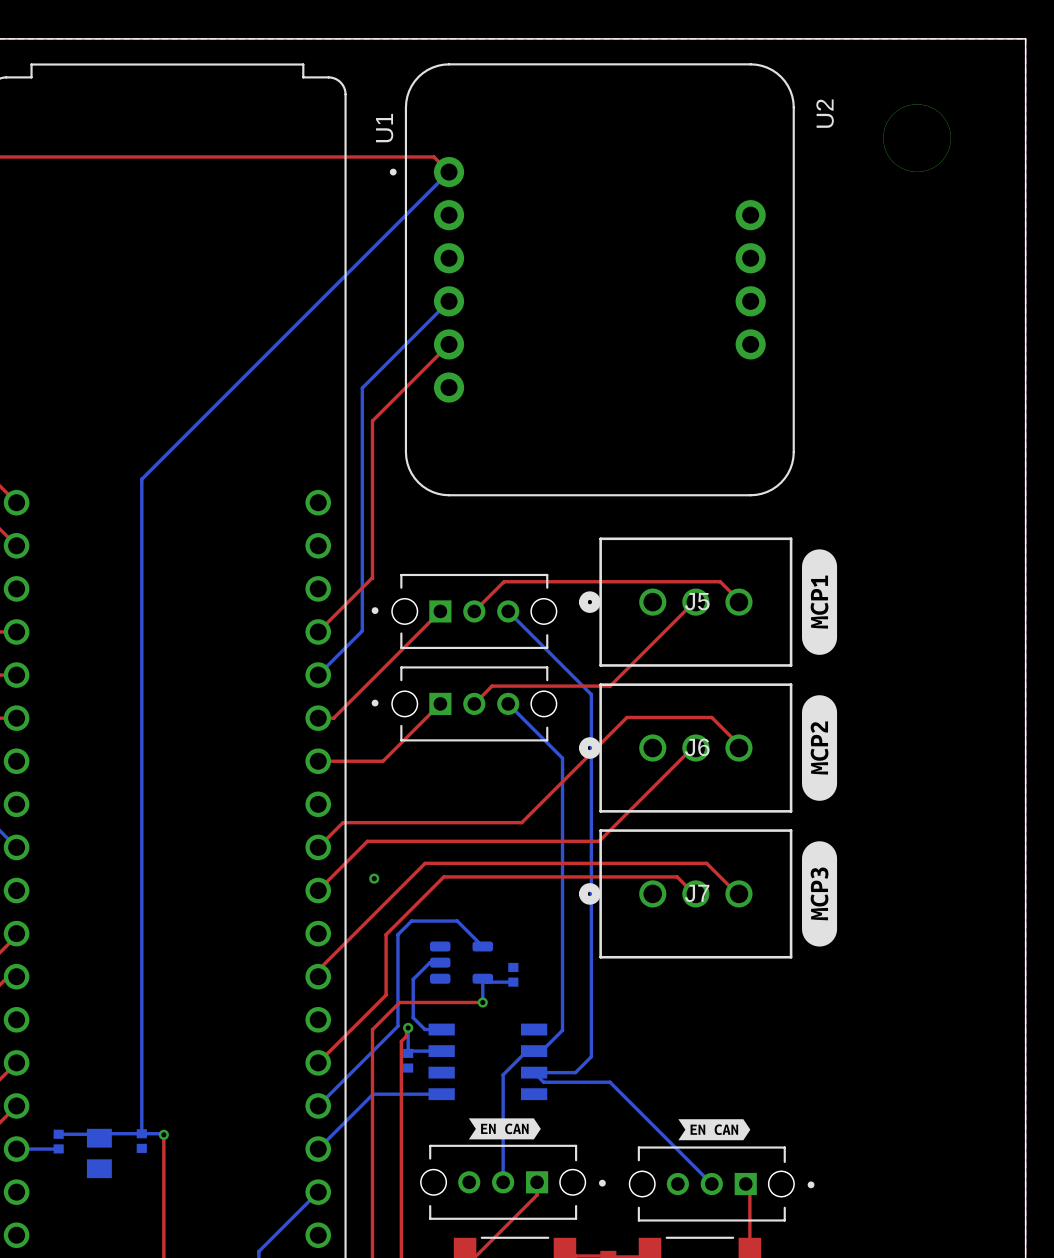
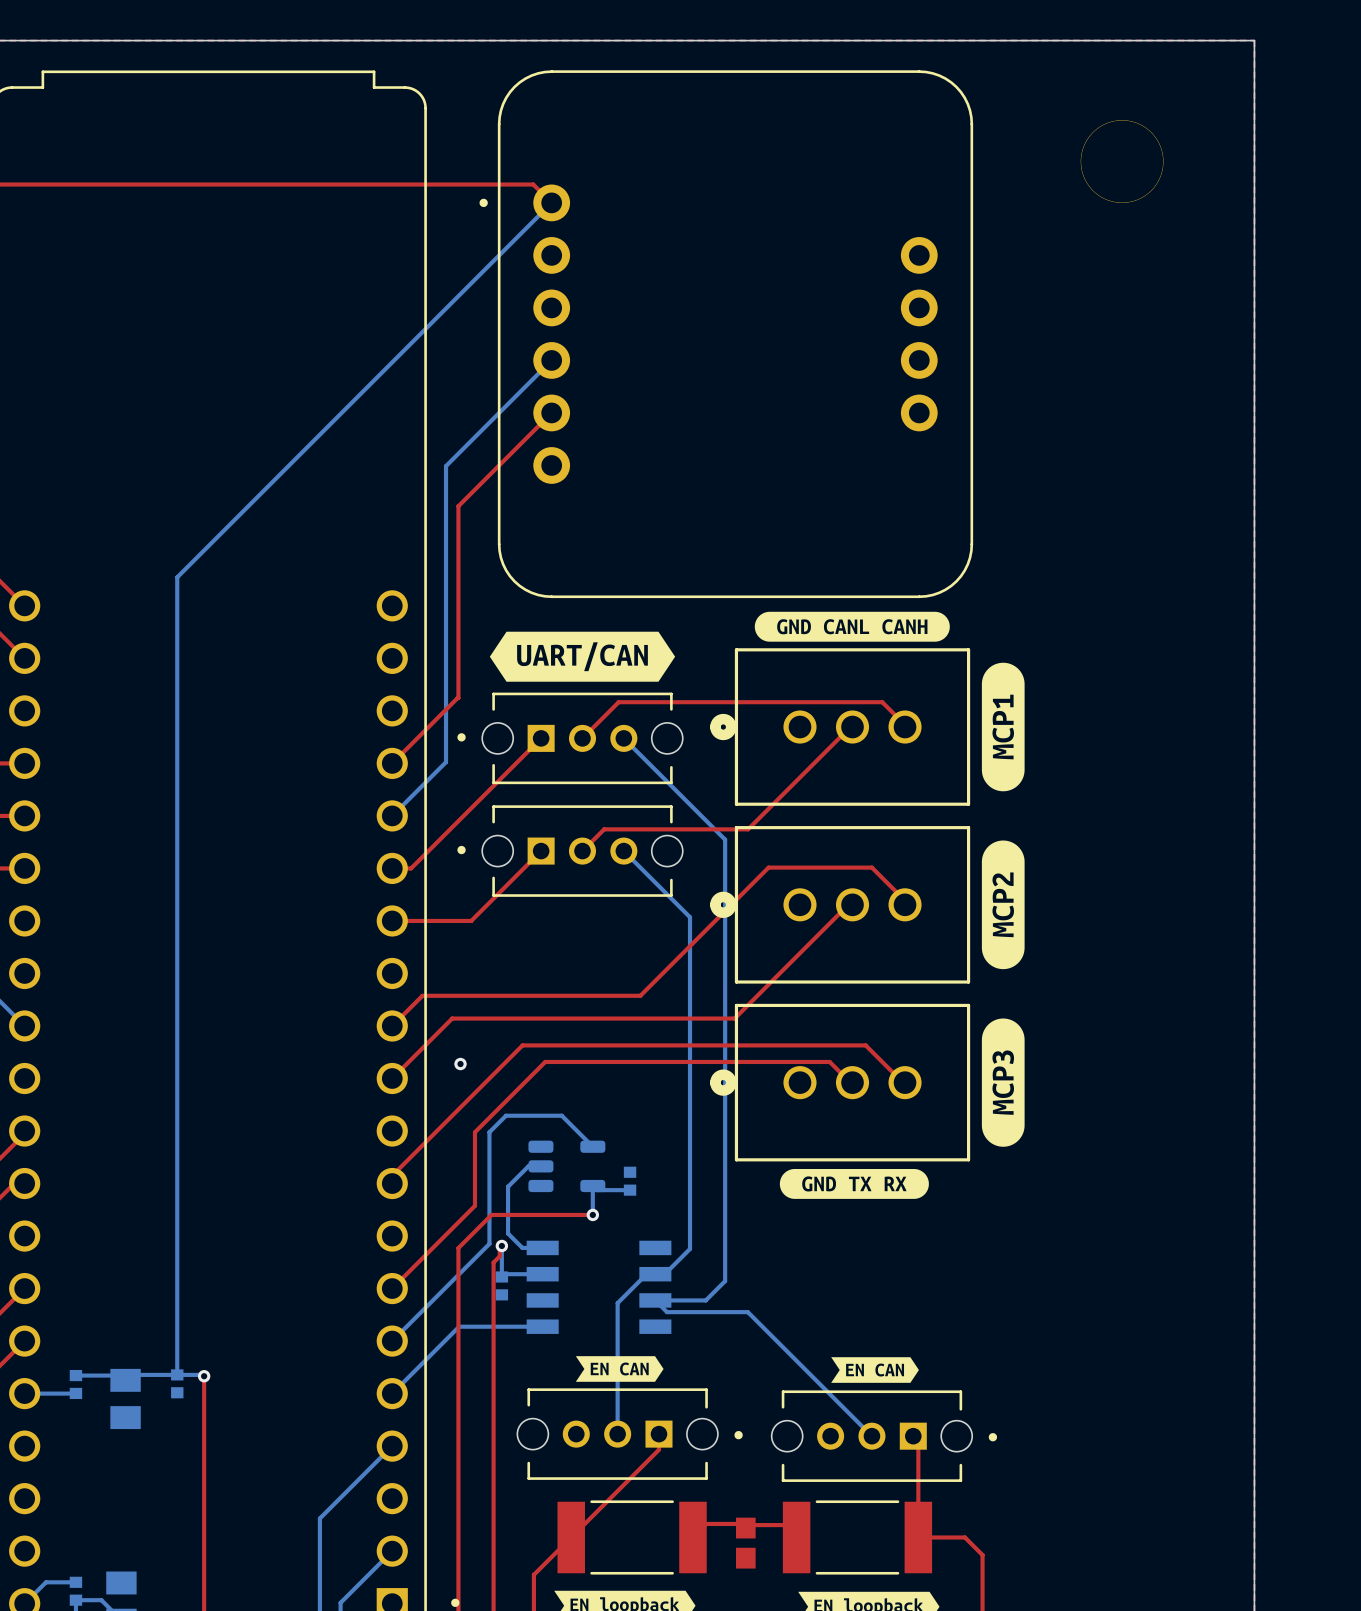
U2 name: U2 (825, 113) -> none
U1 name: U1 (384, 128) -> none
drawing: none -> [754, 611, 950, 642]
drawing: none -> [489, 631, 676, 682]
J5 name: J5 (697, 601) -> none
J6 name: J6 (697, 747) -> none
J7 name: J7 (697, 893) -> none
drawing: none -> [779, 1168, 929, 1199]

